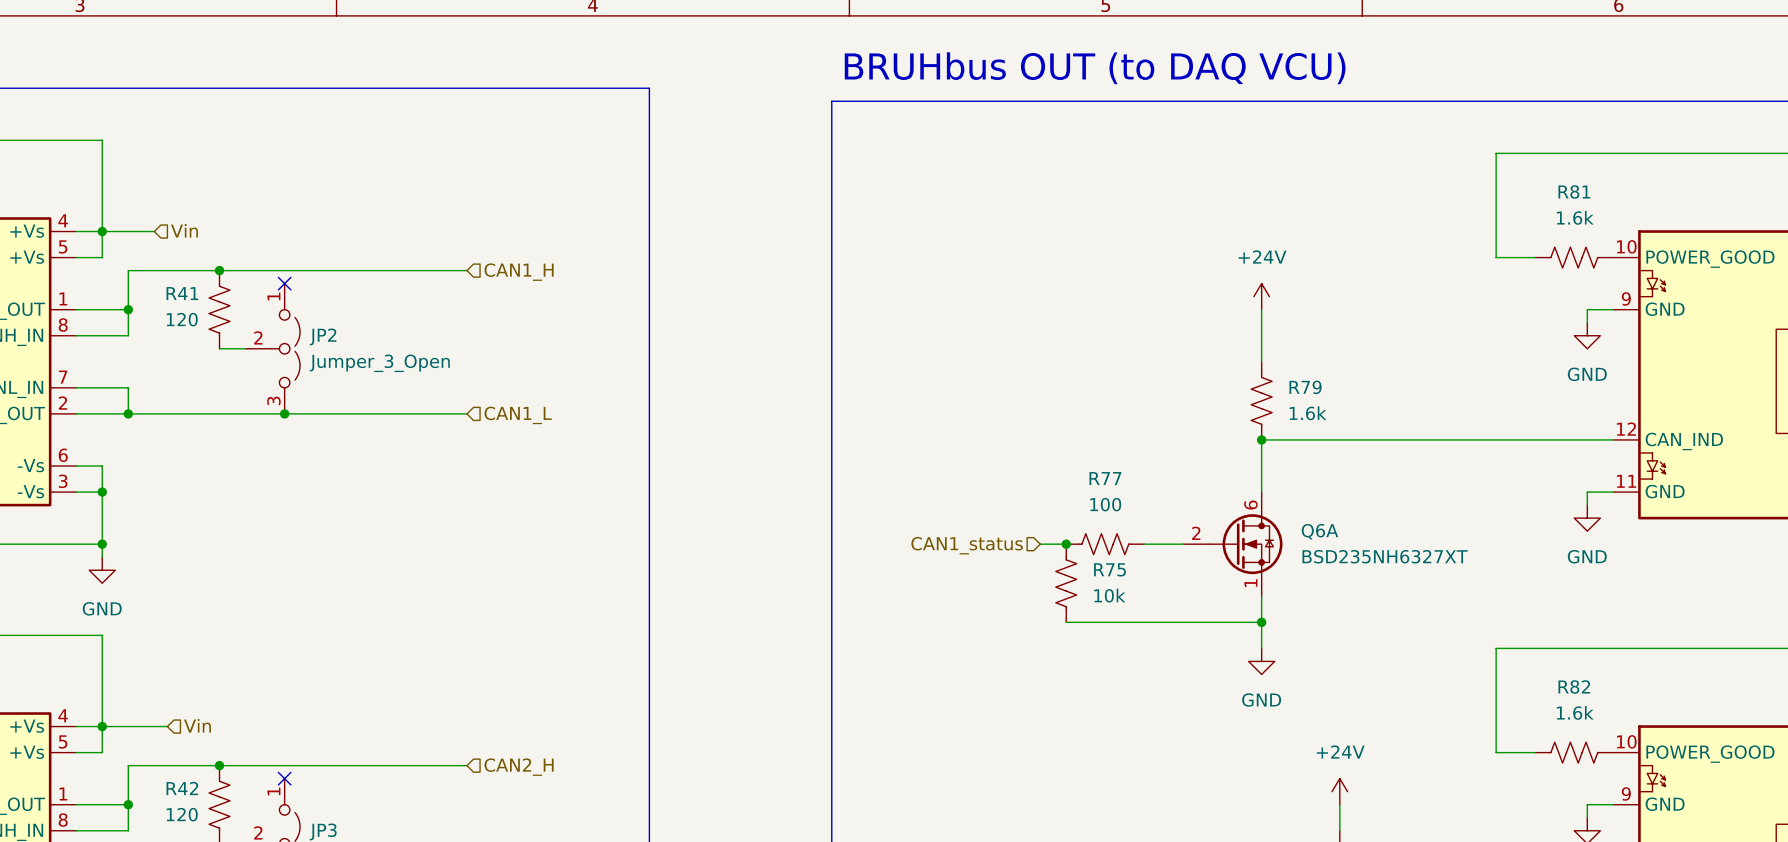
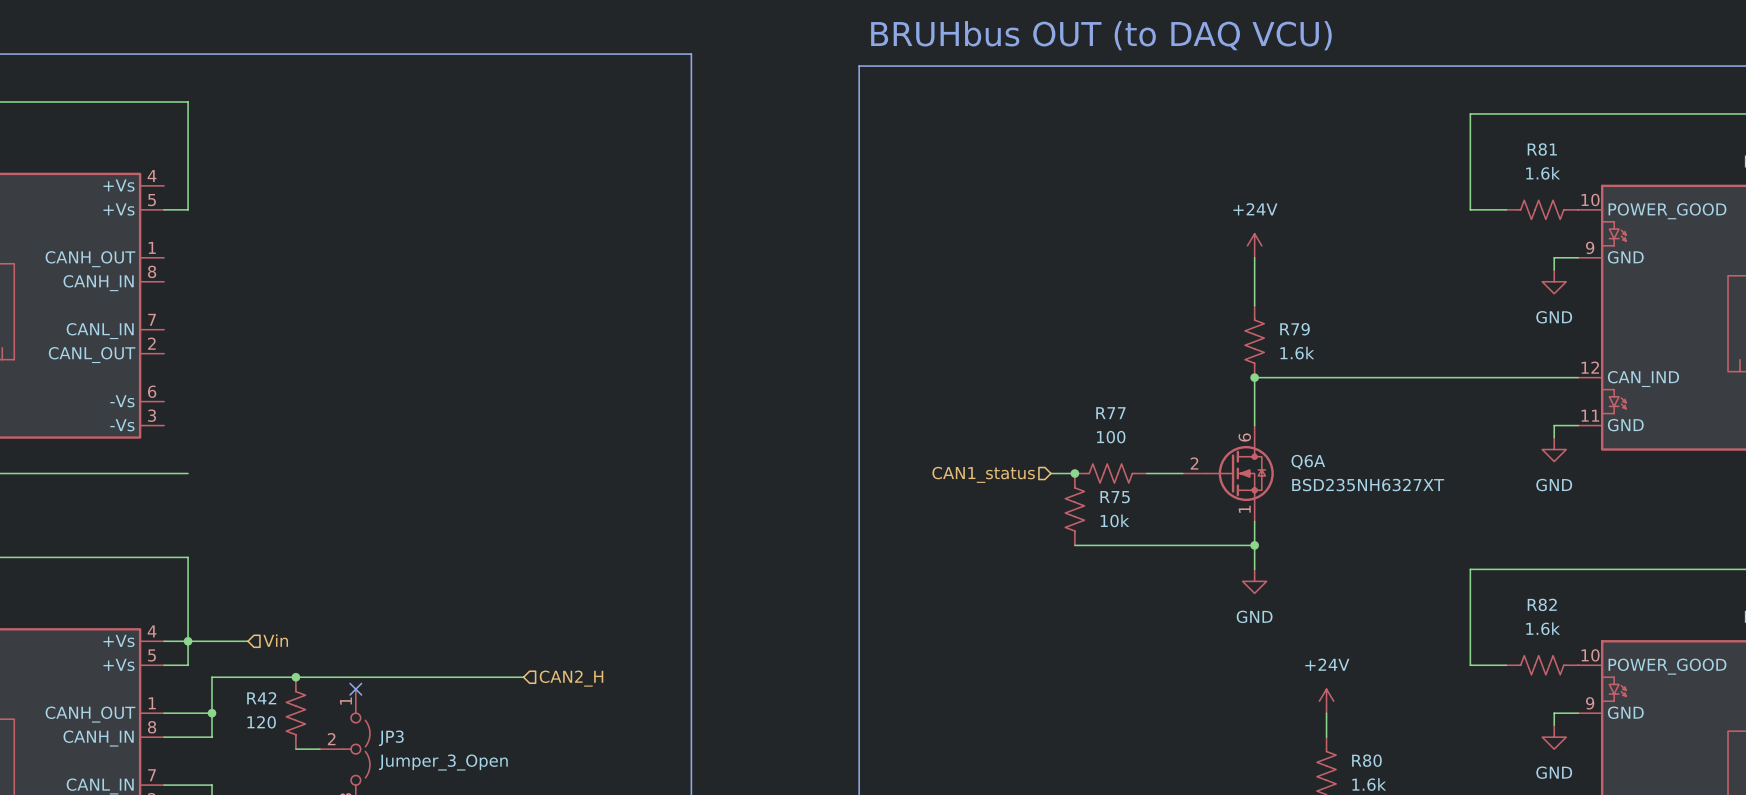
hierarchical label: Vin (184, 230) -> none
wire: (76, 231) (154, 231) -> none
junction: (102, 231) -> none
junction: (219, 270) -> none
wire: (467, 270) (128, 270) (128, 335) (76, 335) -> none
hierarchical label: CAN1_H (519, 272) -> none
no-connect mark: (284, 283) -> none
wire: (76, 309) (128, 309) -> none
junction: (128, 309) -> none
R41: 120 (219, 309) -> none
wire: (219, 348) (245, 348) -> none
JP2: Jumper_3_Open (272, 348) -> none
wire: (76, 387) (128, 387) (128, 413) -> none
wire: (76, 413) (467, 413) -> none
junction: (128, 413) -> none
junction: (284, 413) -> none
hierarchical label: CAN1_L (518, 415) -> none
wire: (76, 466) (102, 466) (102, 557) -> none
wire: (76, 492) (102, 492) -> none
junction: (102, 492) -> none
junction: (102, 544) -> none
power symbol: GND (102, 570) -> none

